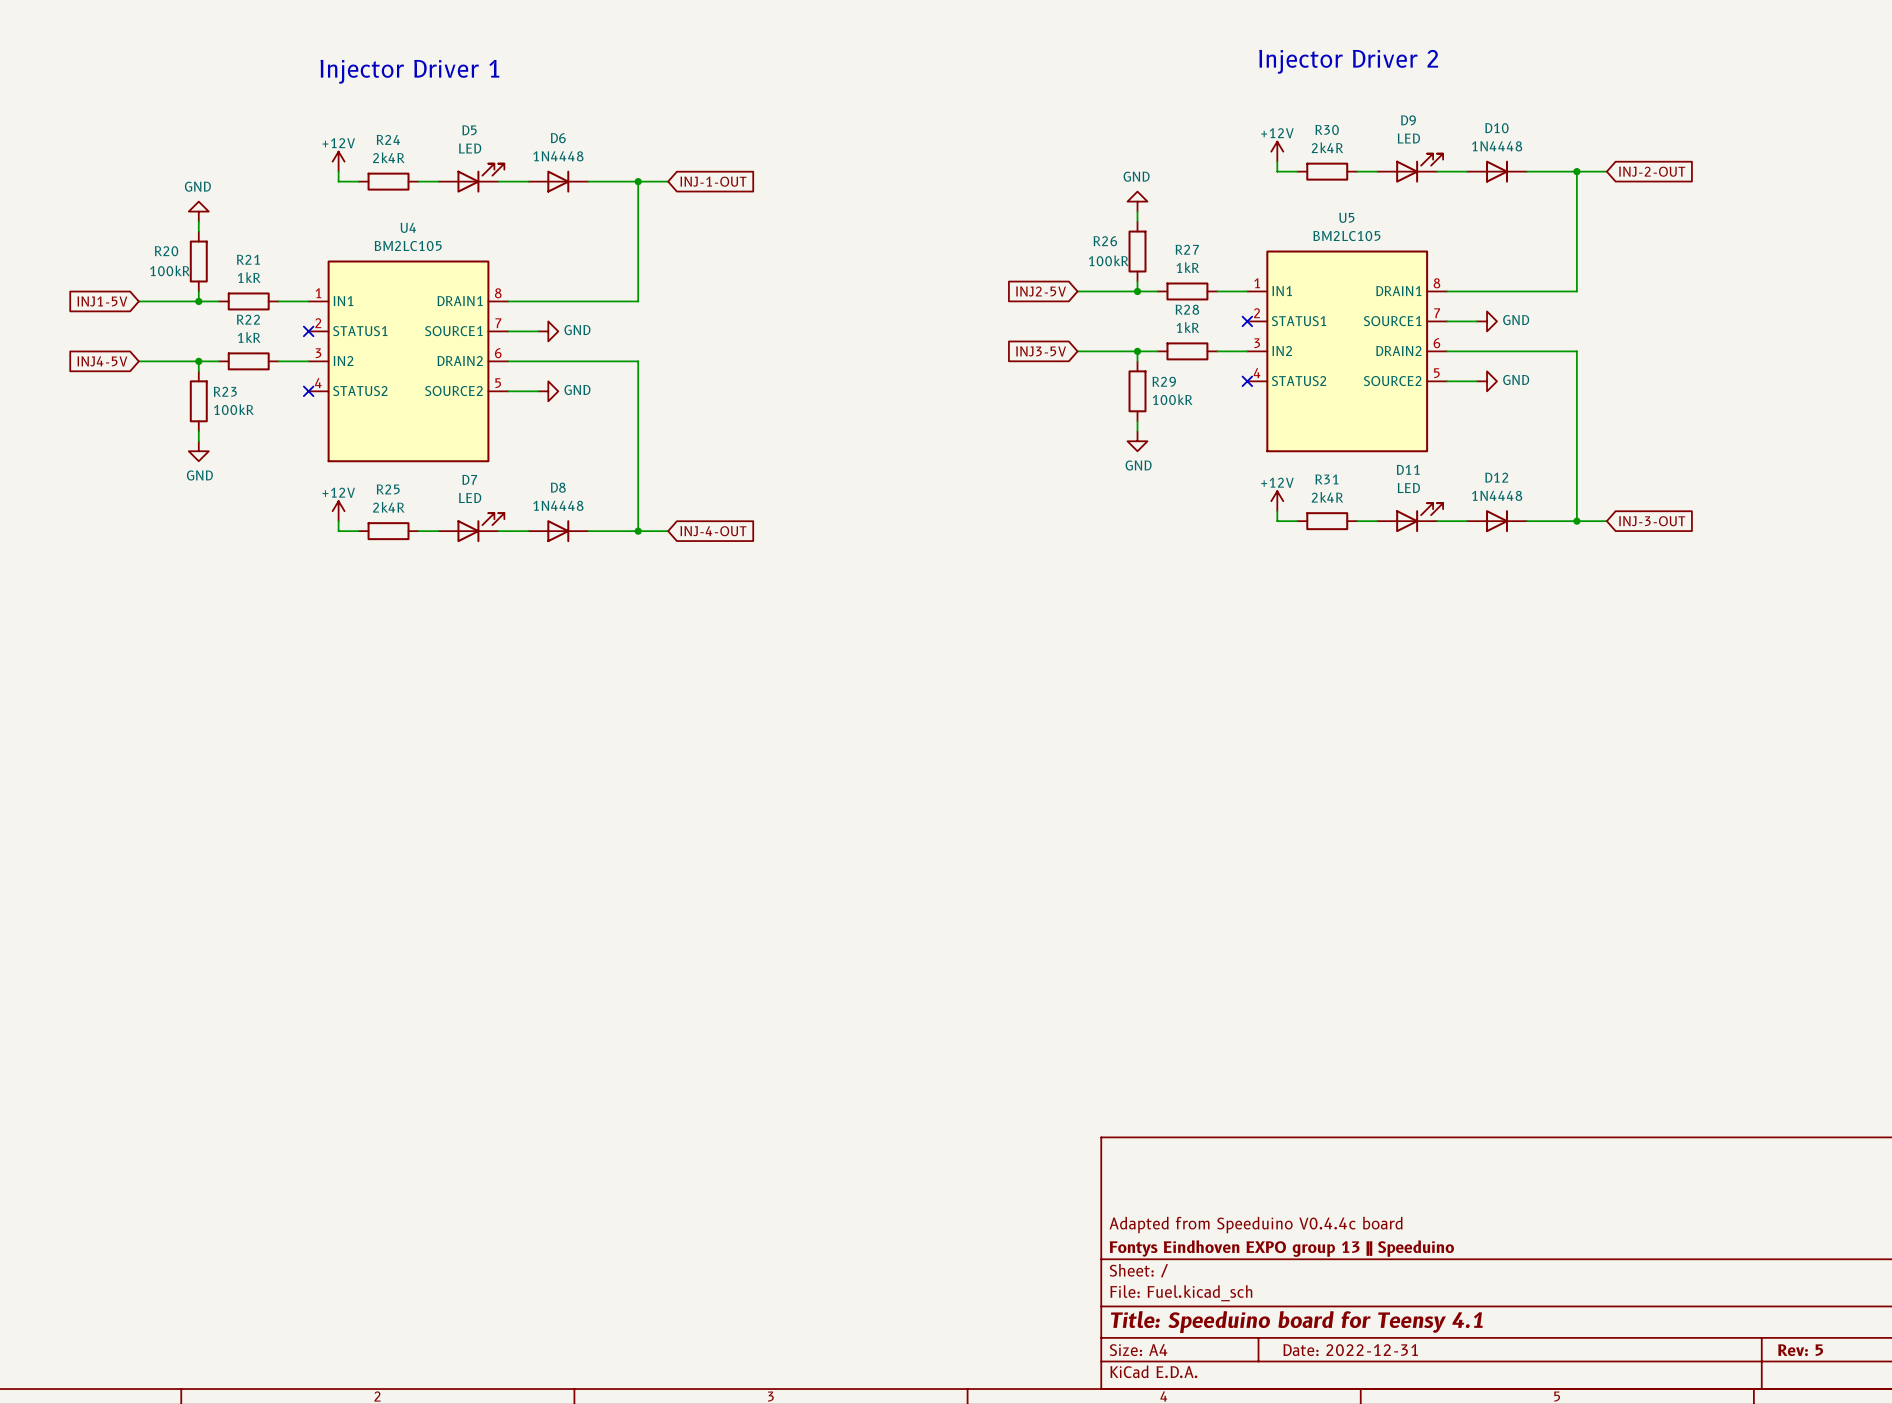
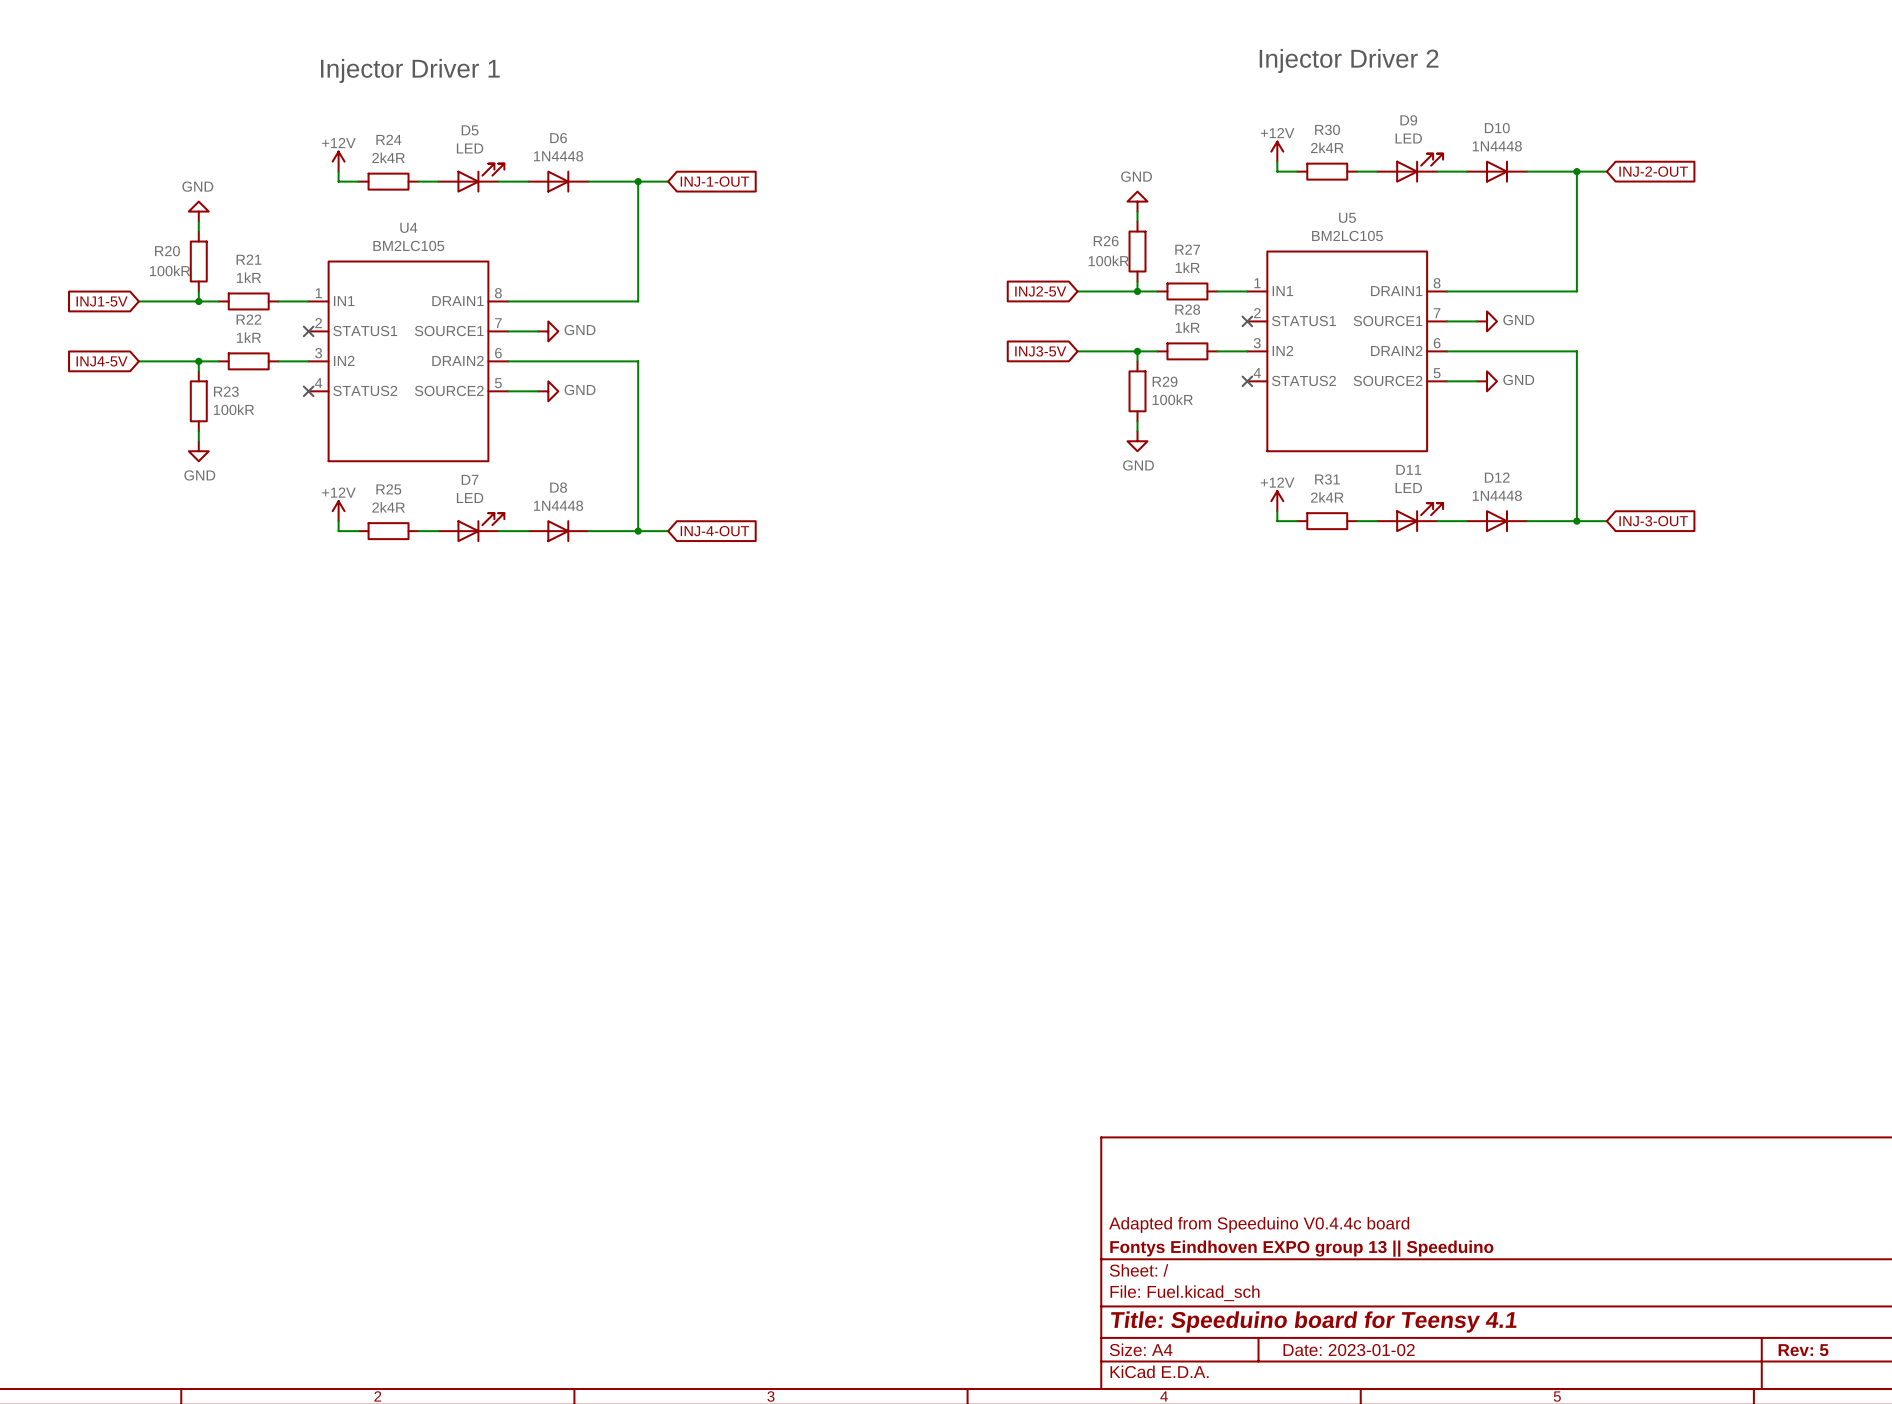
title block: Date: 2022-12-31 (1350, 1350) -> Date: 2023-01-02 (1349, 1350)

